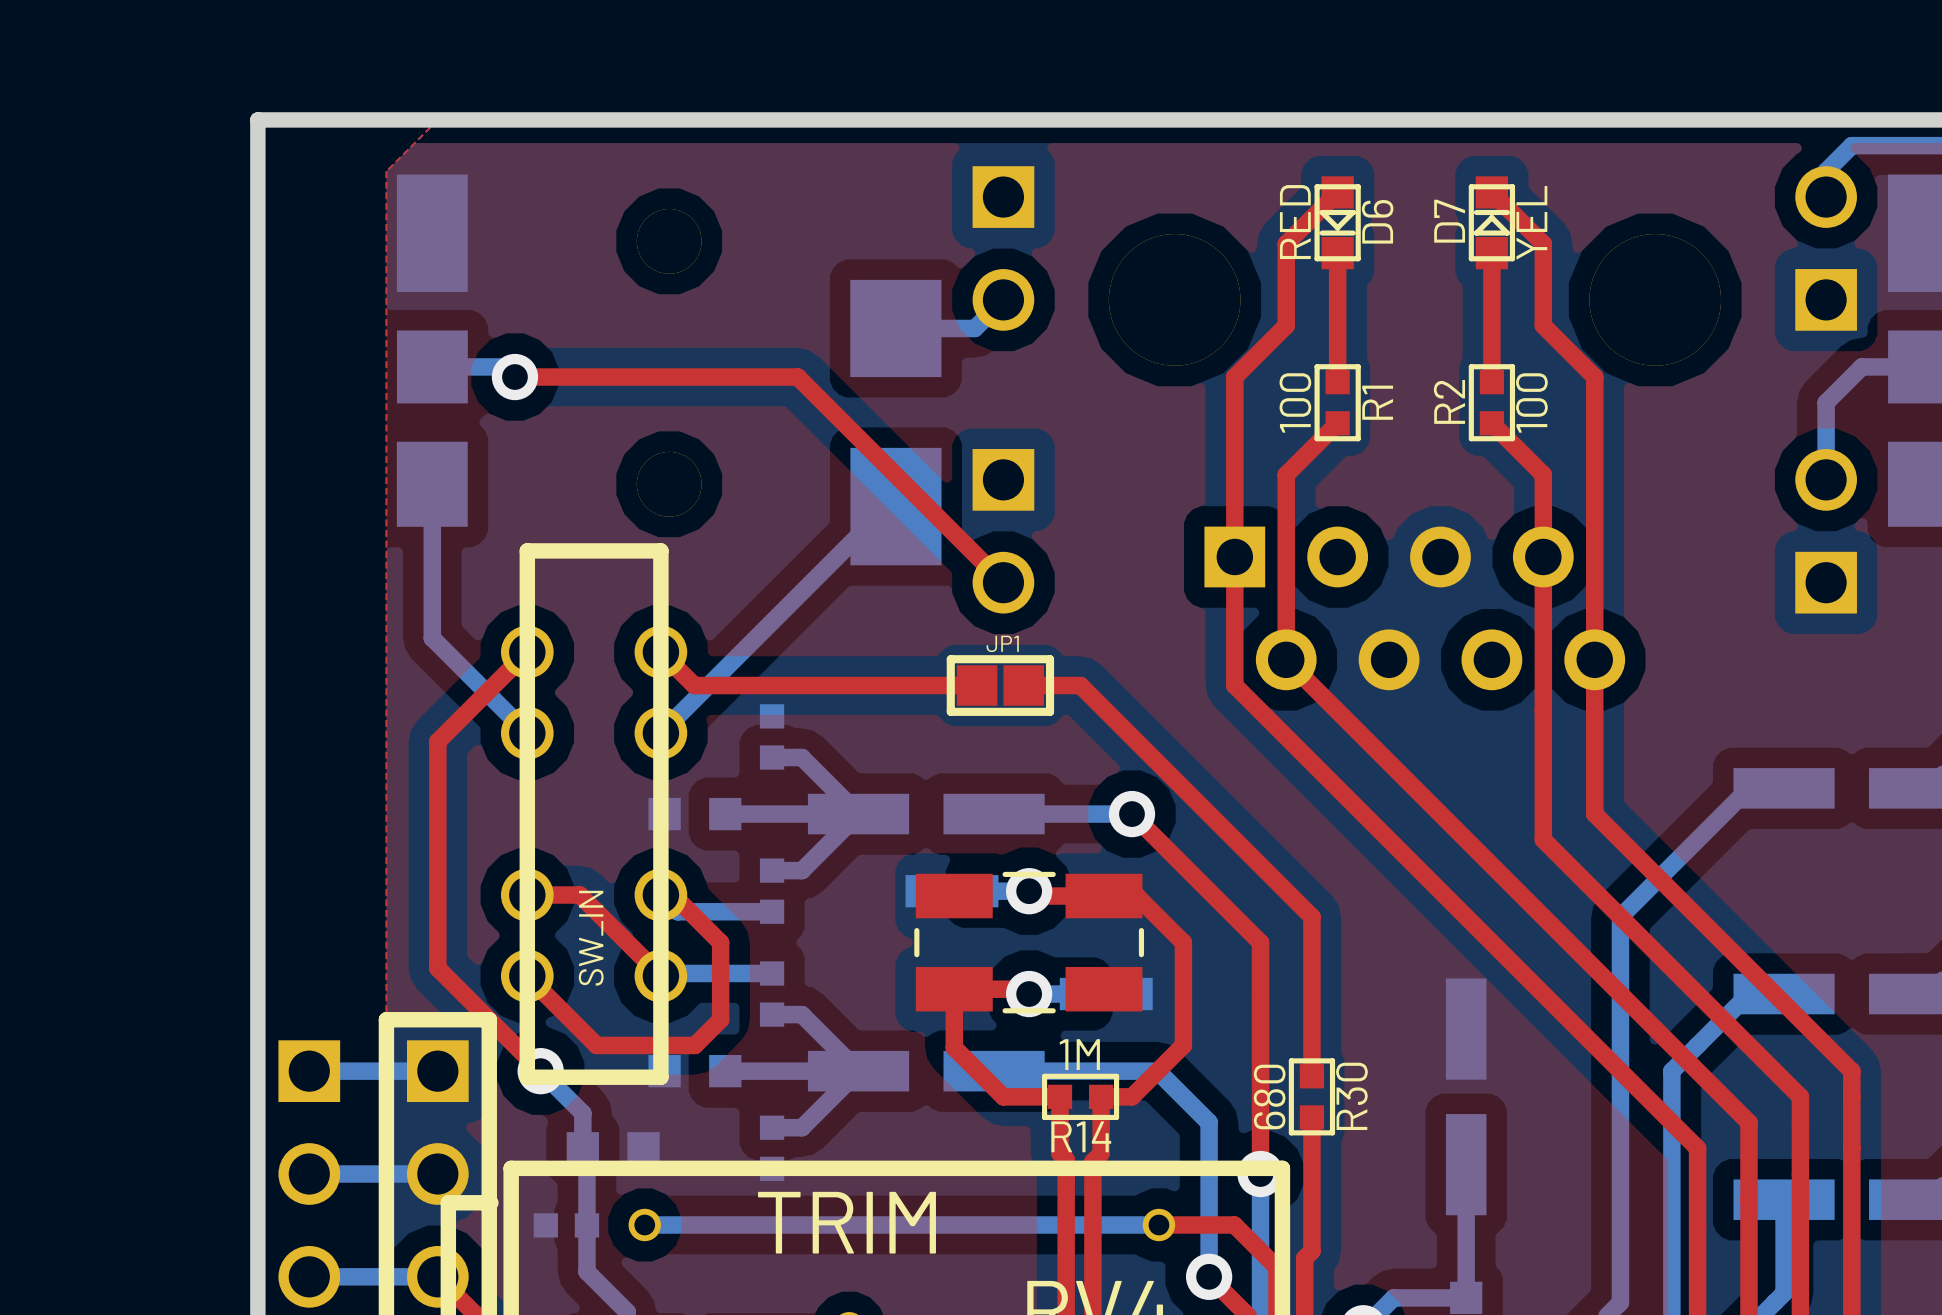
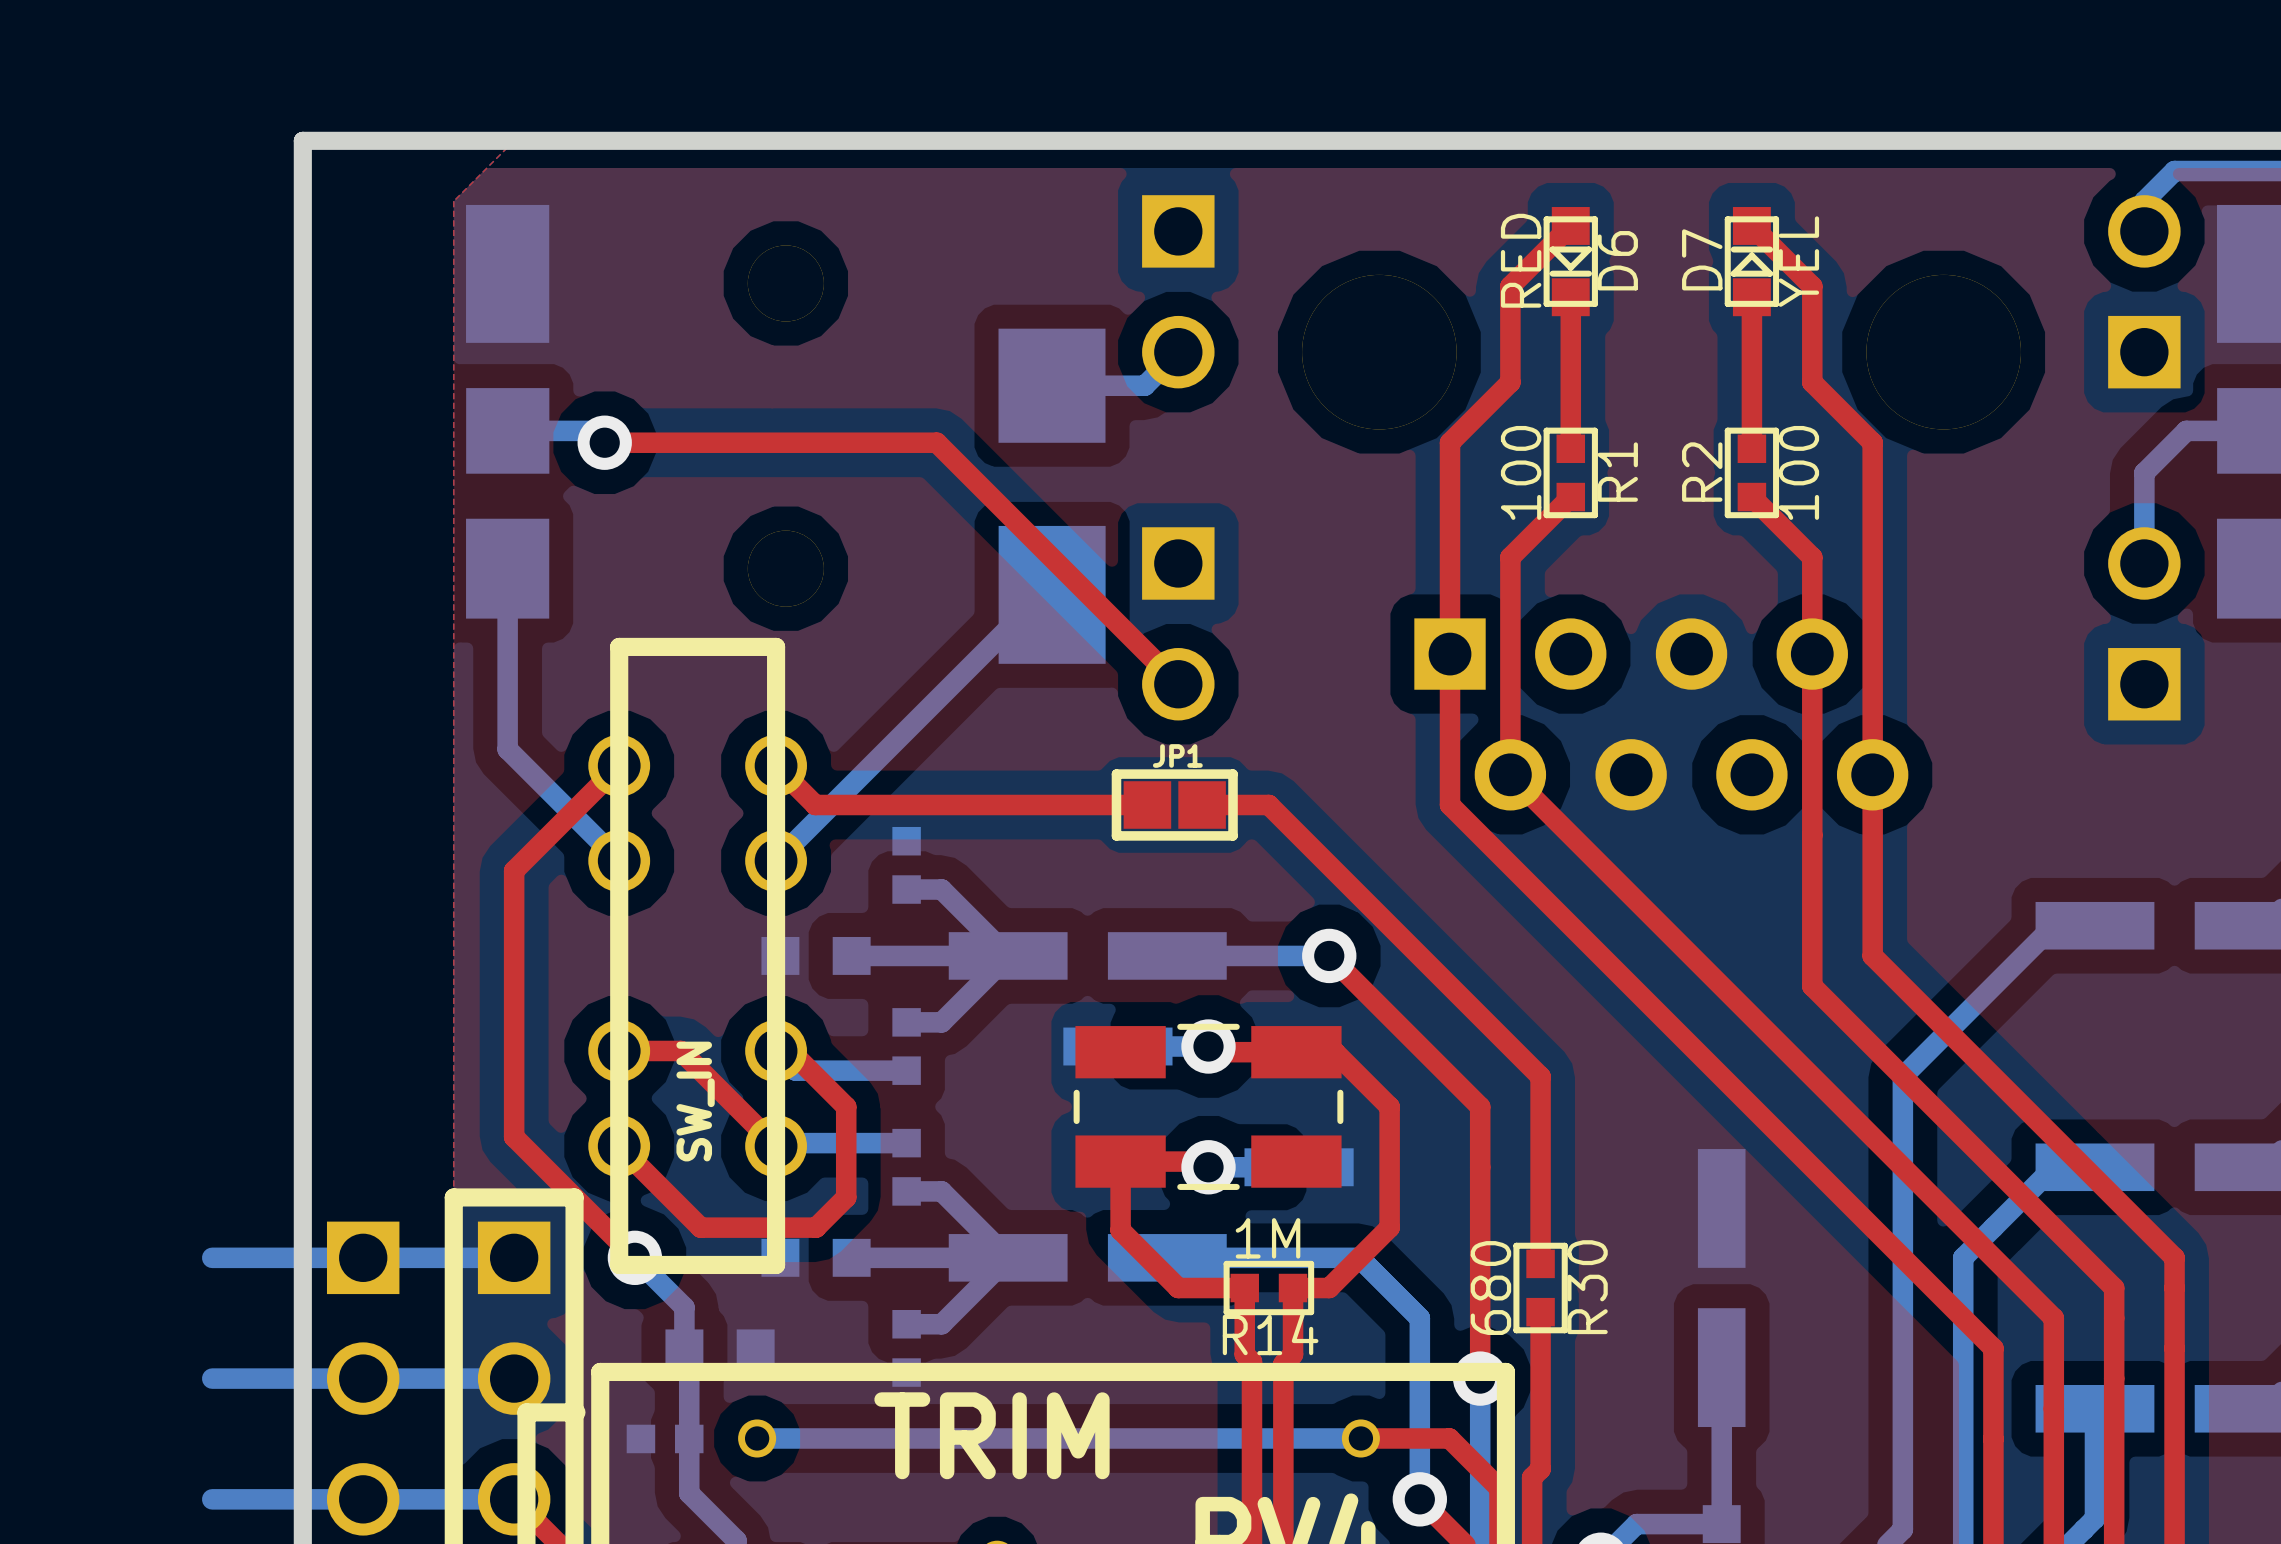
bottom track: none -> (212, 1257) (363, 1257)
bottom track: none -> (212, 1378) (363, 1378)
bottom track: none -> (212, 1499) (363, 1499)

